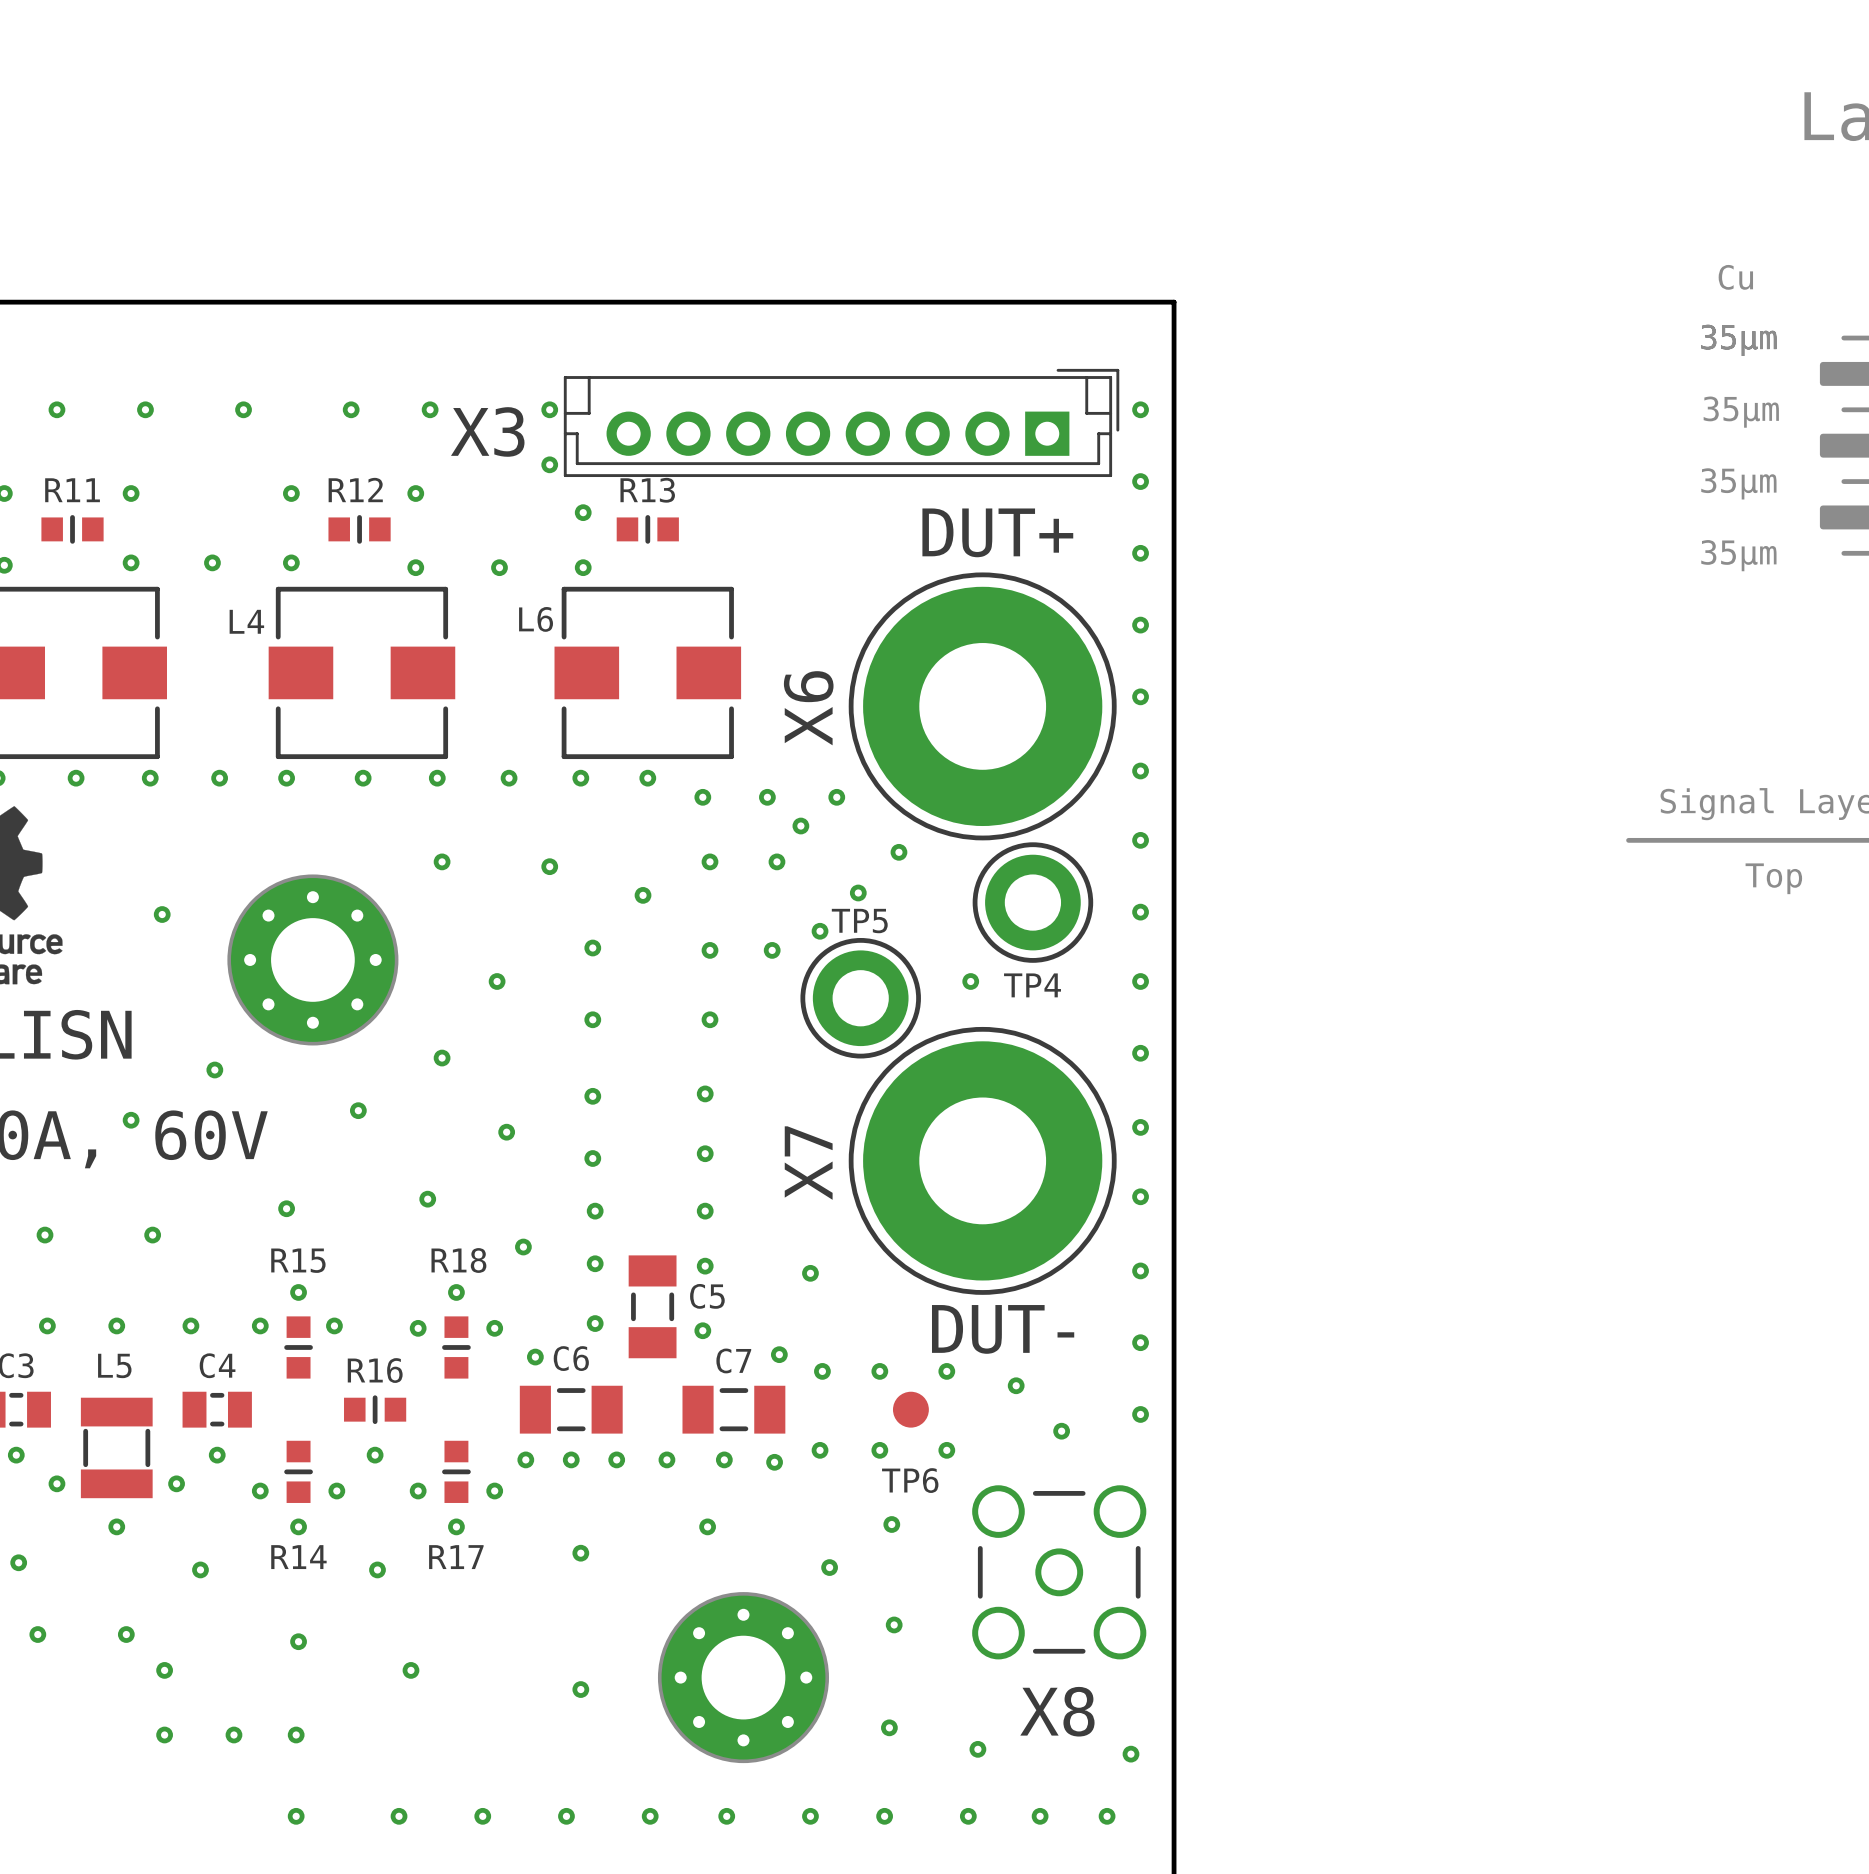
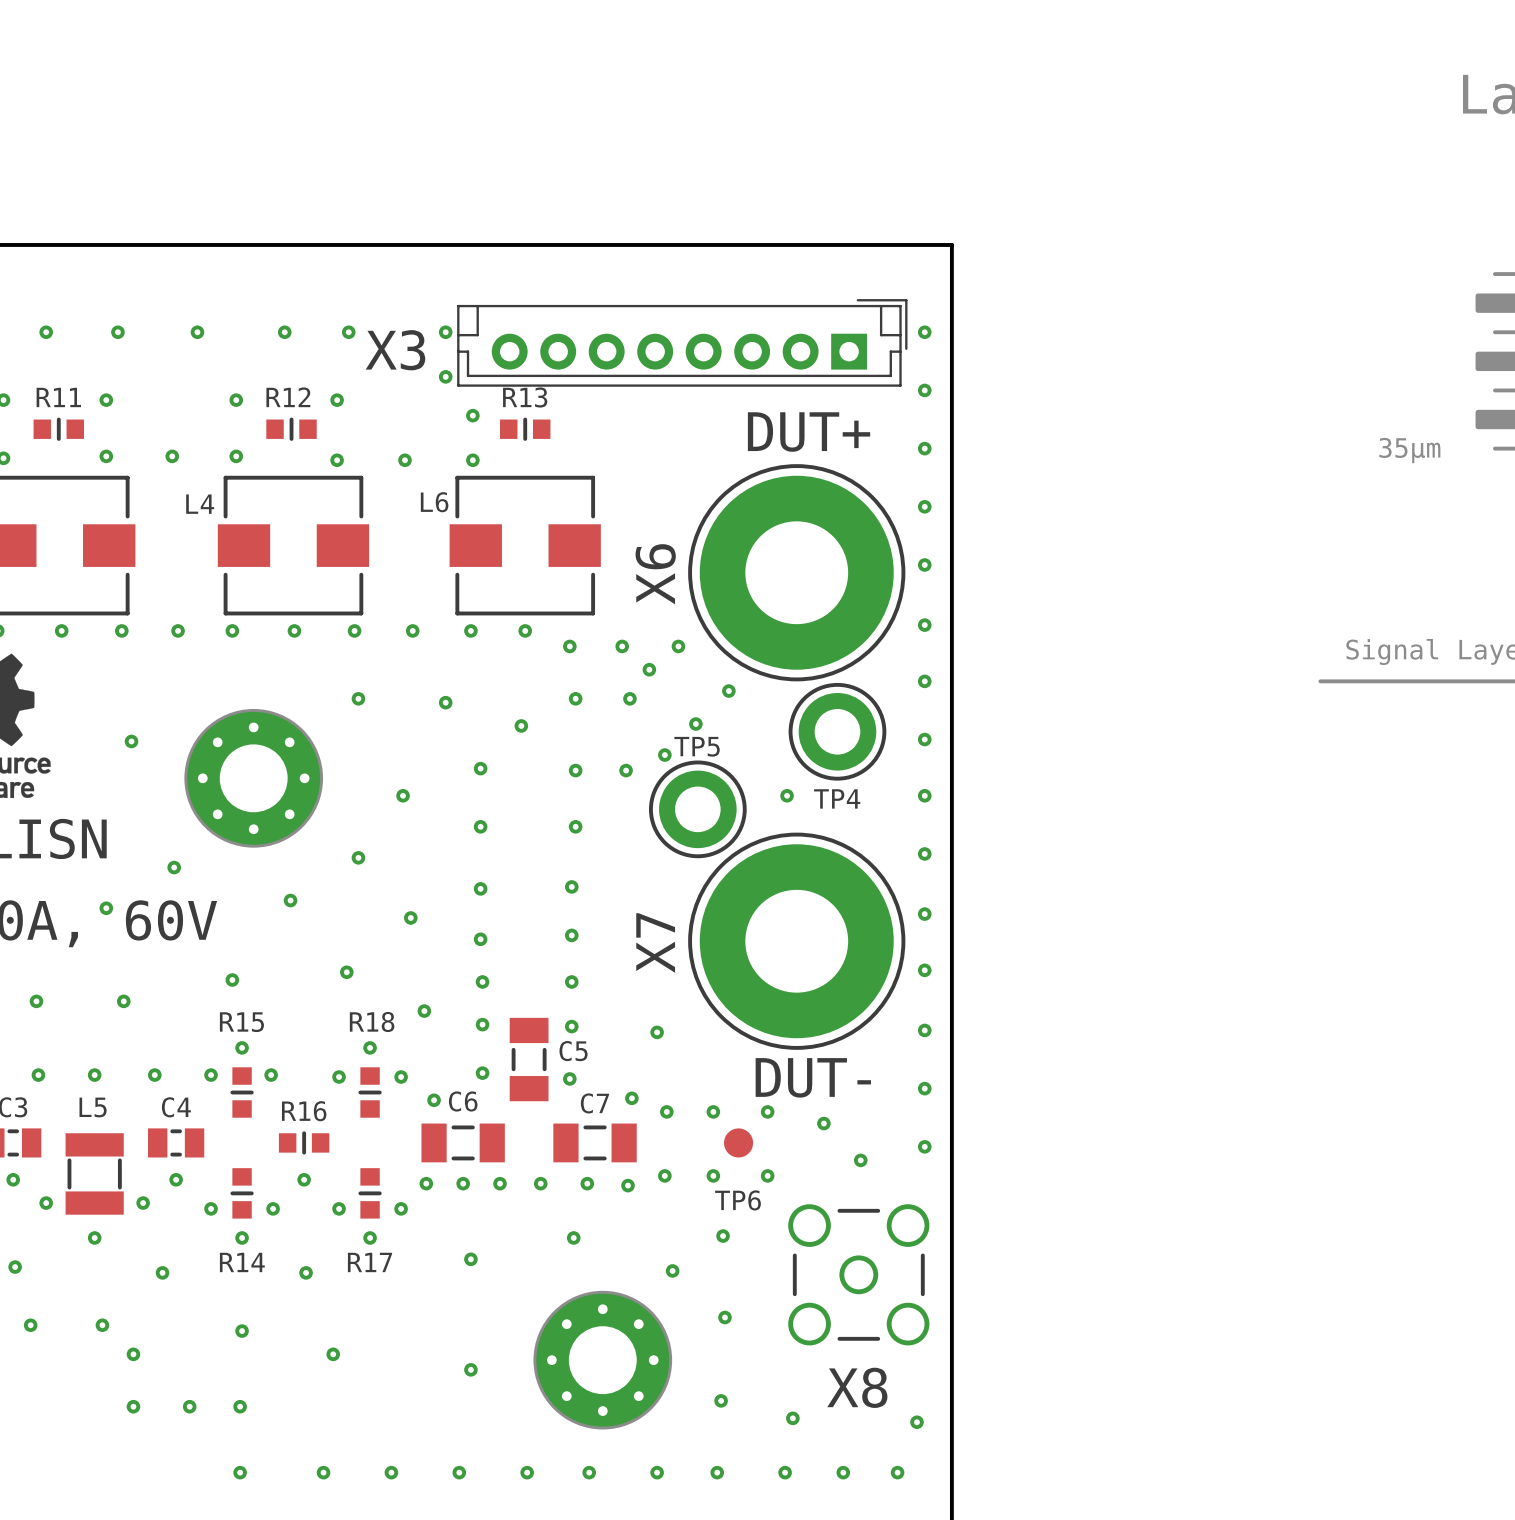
text: Cu (1735, 277) -> none
text: 35µm (1738, 340) -> none
text: 35µm (1741, 412) -> none
text: 35µm (1738, 483) -> none
text: Top (1773, 878) -> none

